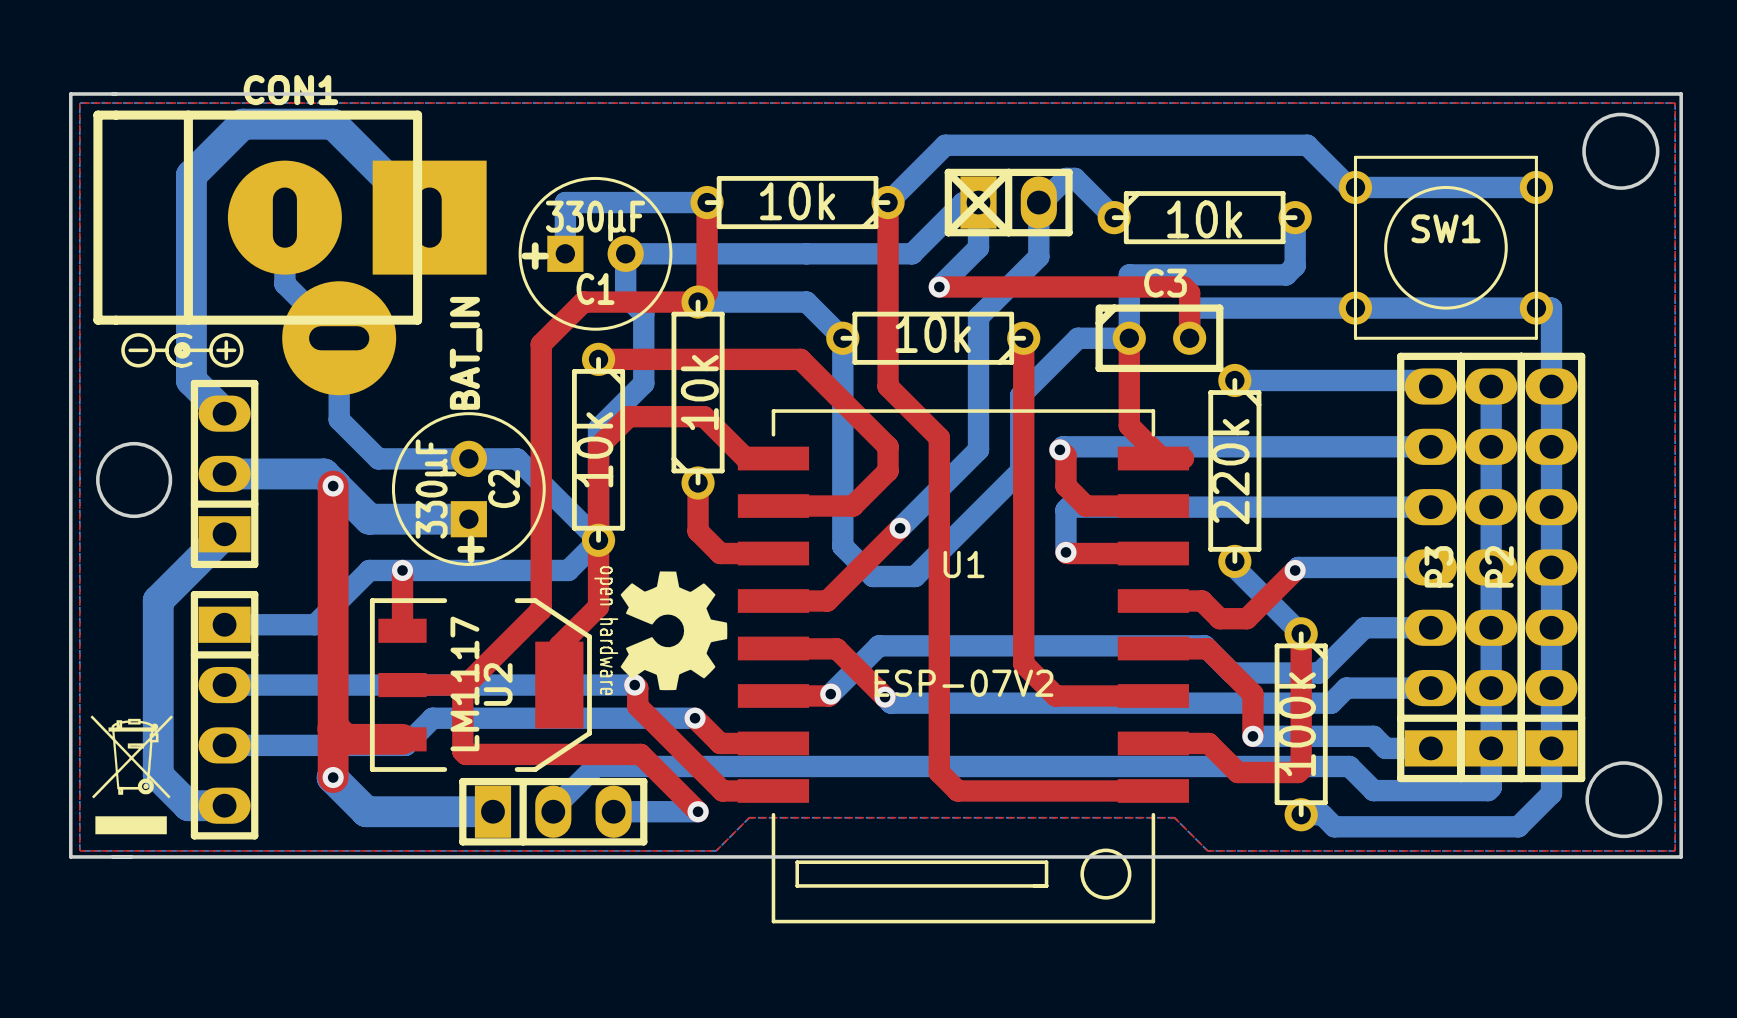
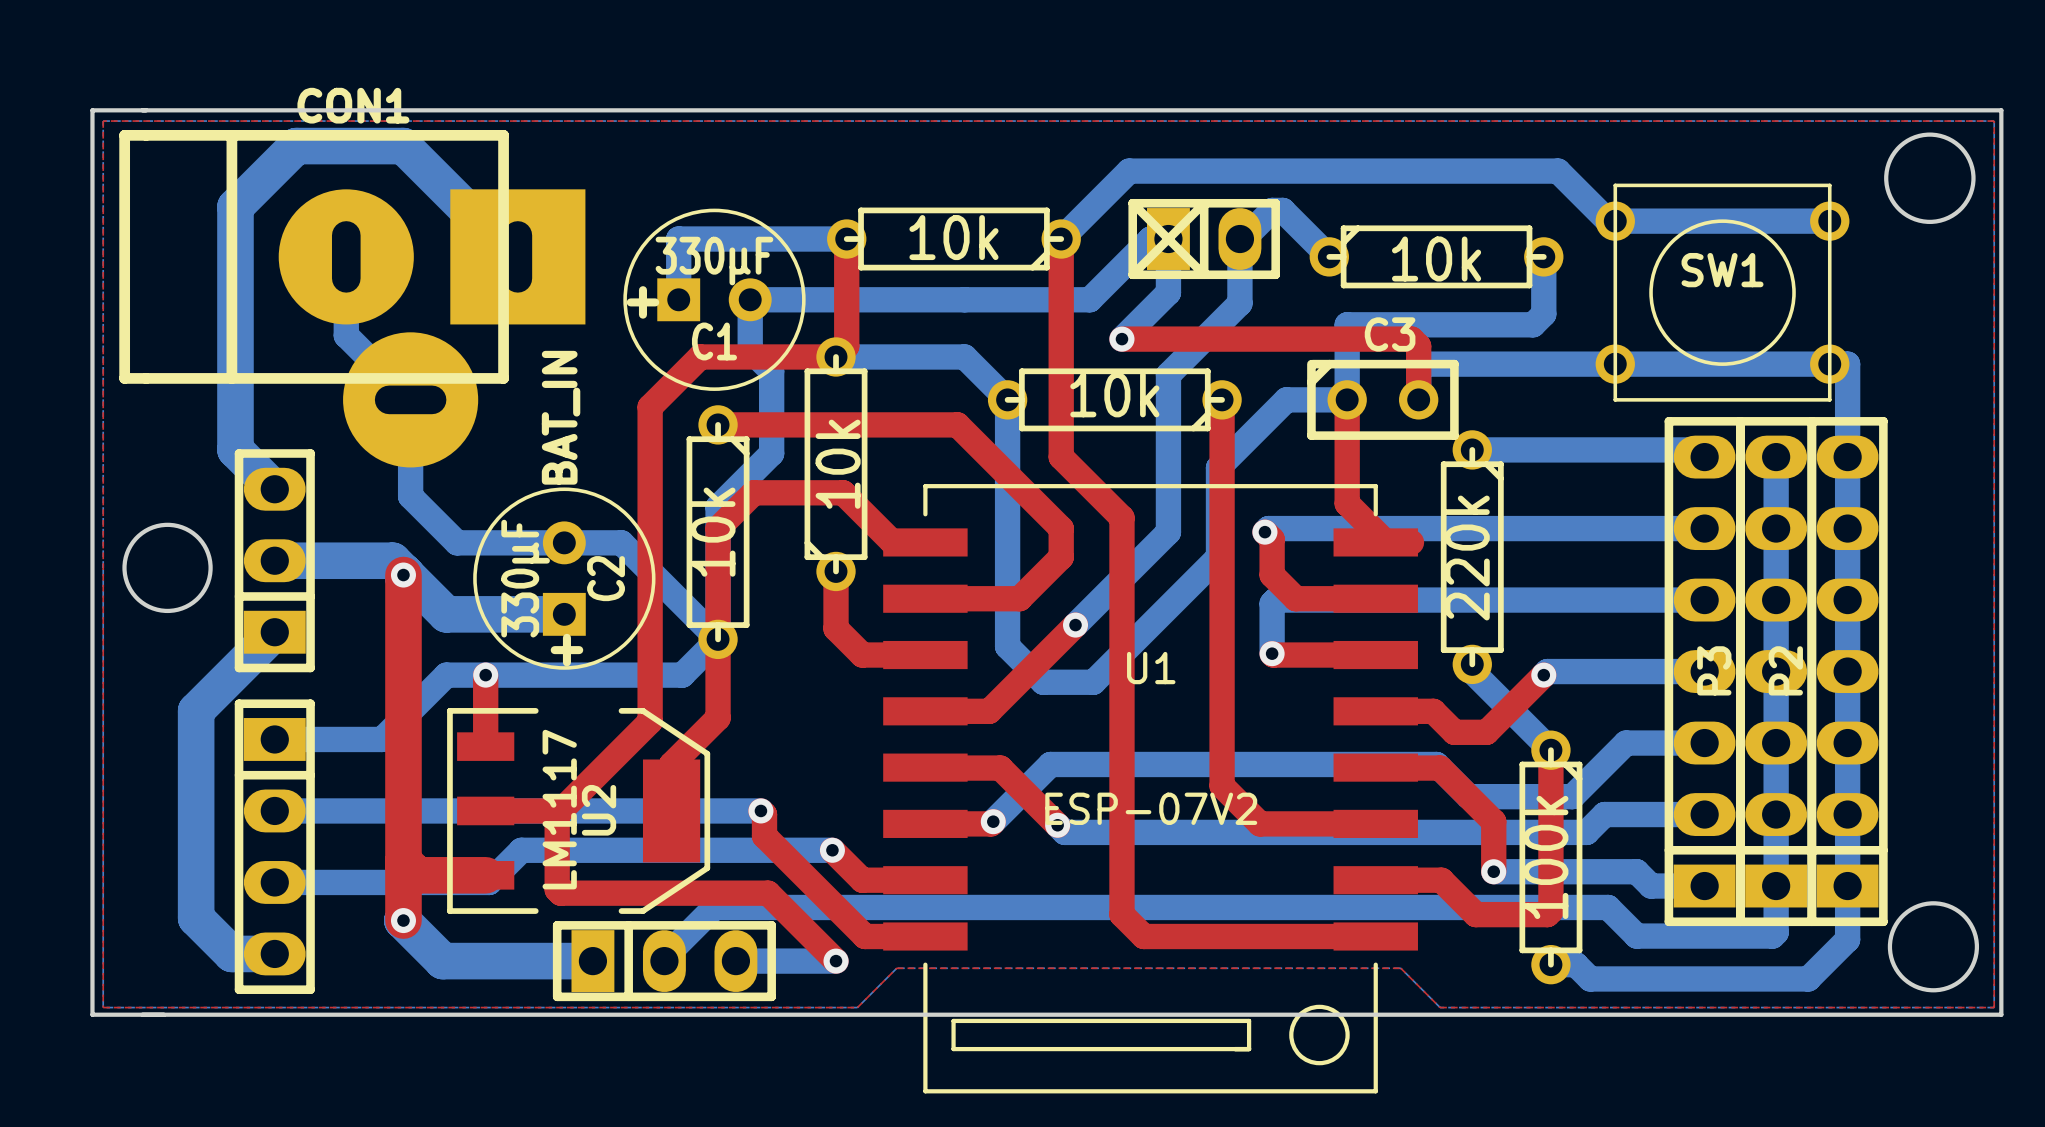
drawing: [121, 333, 244, 368] -> none
drawing: [594, 566, 728, 696] -> none
drawing: [90, 715, 173, 835] -> none

